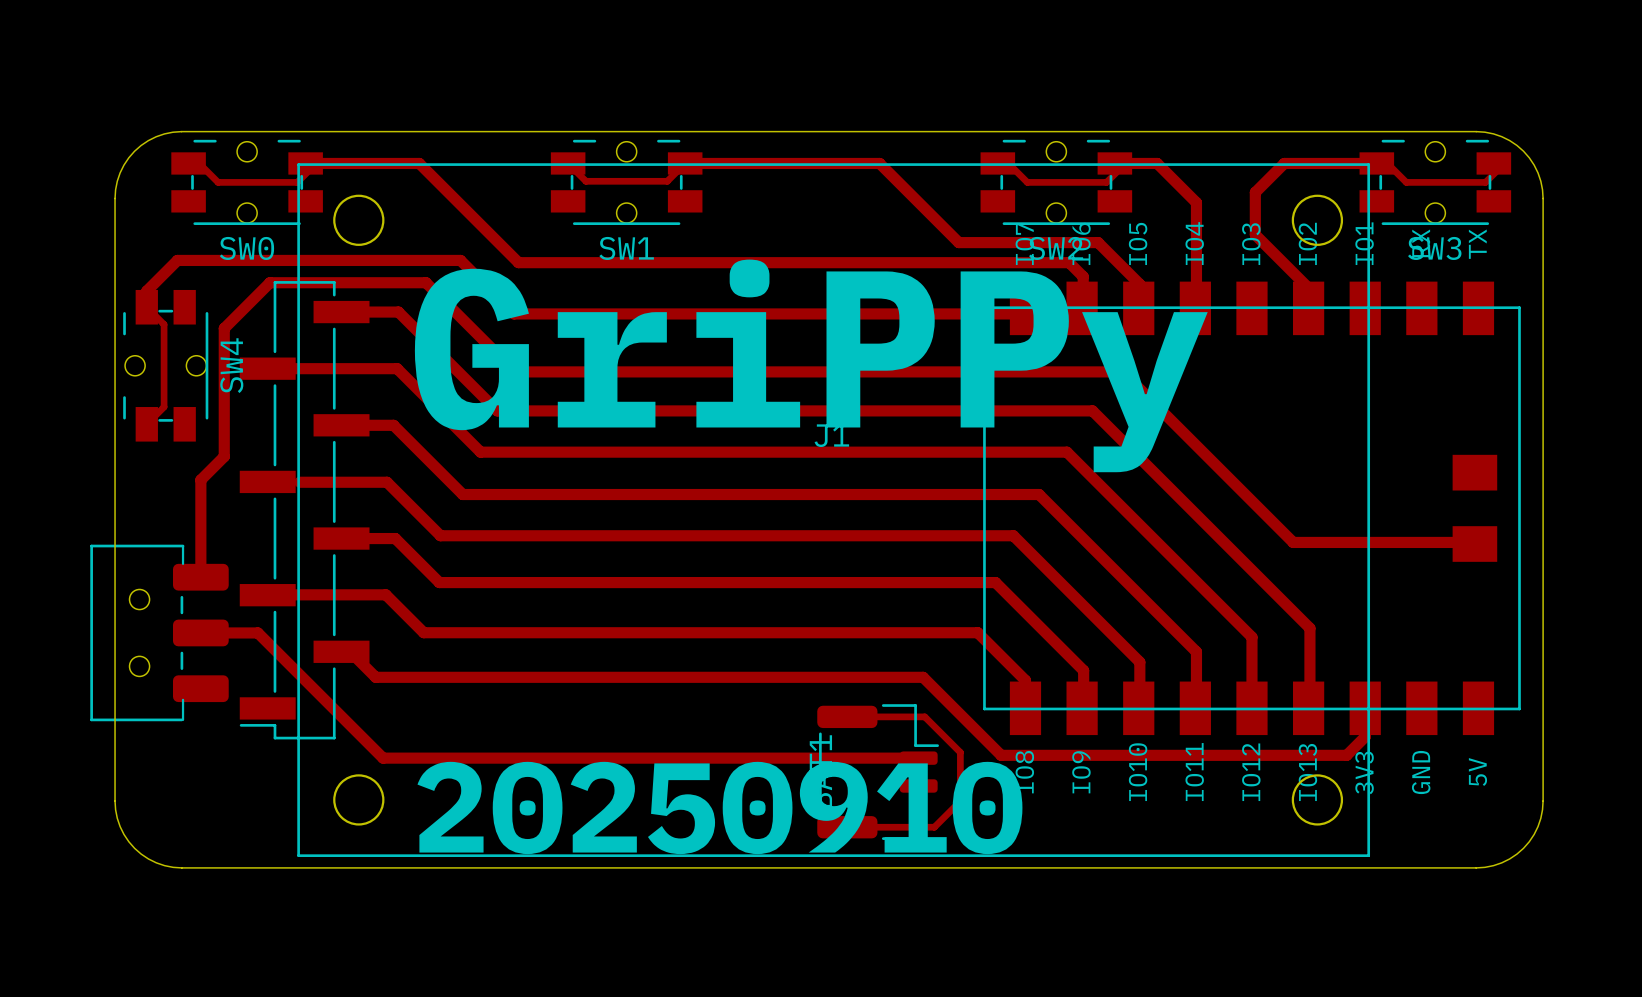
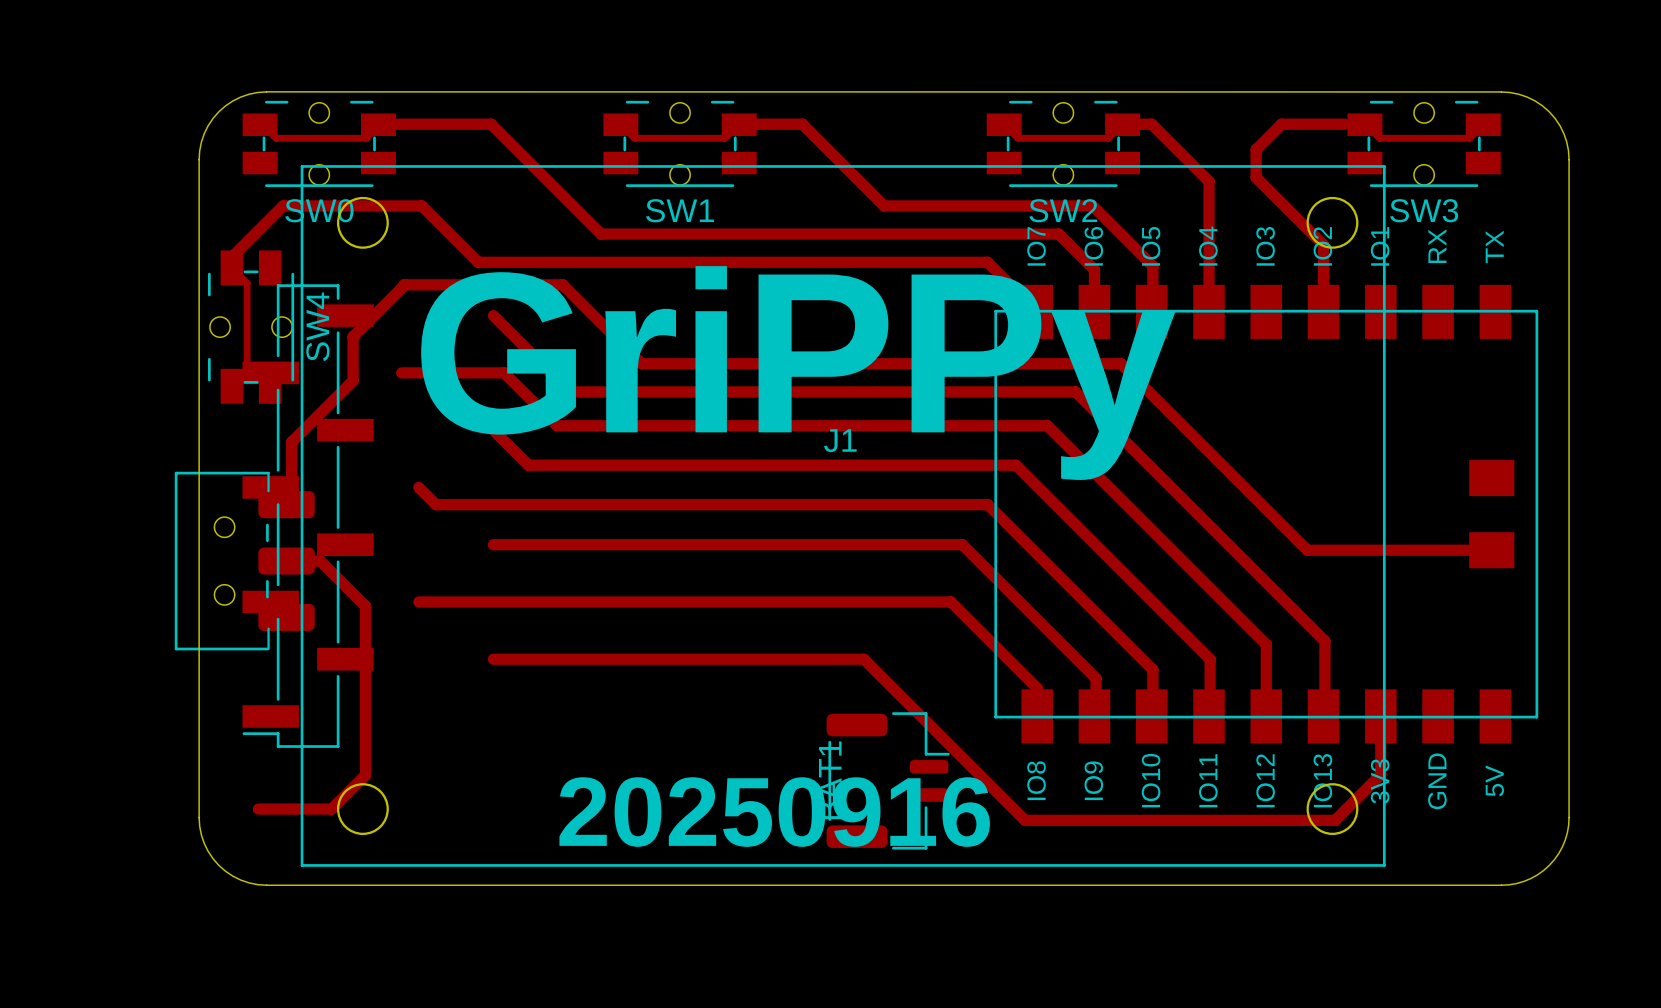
top track: none -> (262, 124) (276, 138) (366, 138) (380, 124)
top track: none -> (378, 124) (491, 124) (601, 234) (1058, 234) (1094, 269) (1094, 311)
top track: none -> (620, 124) (634, 138) (724, 138) (738, 124)
top track: none -> (1003, 124) (1017, 138) (1108, 138) (1122, 124)
top track: none -> (1123, 124) (1151, 124) (1209, 181) (1209, 311)
top track: none -> (1344, 124) (1281, 124) (1256, 149) (1256, 177) (1323, 245) (1323, 311)
top track: none -> (1365, 124) (1379, 138) (1469, 138) (1483, 124)
board edge: (181, 131) (1476, 131) (1493, 133) (1509, 140) (1523, 151) (1534, 165) (1540, 181) (1543, 198) (1543, 801) (1540, 818) (1534, 834) (1523, 848) (1509, 858) (1493, 865) (1476, 867) (181, 867) (164, 865) (148, 858) (134, 848) (123, 834) (117, 818) (115, 801) (115, 198) (120, 172) (134, 151) (156, 136) (181, 131) -> (266, 91) (1501, 91) (1518, 94) (1535, 101) (1549, 111) (1560, 125) (1566, 142) (1569, 159) (1569, 817) (1565, 839) (1558, 853) (1543, 870) (1530, 878) (1516, 883) (1501, 885) (266, 885) (249, 882) (232, 876) (218, 865) (208, 851) (201, 835) (199, 817) (199, 159) (204, 133) (218, 111) (240, 97) (266, 91)
top track: (199, 163) (218, 182) (297, 182) (316, 163) (419, 163) (518, 262) (1069, 262) (1083, 276) (1082, 314) -> none
top track: (568, 163) (585, 181) (667, 181) (685, 163) (879, 163) (958, 242) (1098, 242) (1139, 284) -> (739, 124) (802, 124) (884, 205) (1092, 205) (1152, 266) (1152, 287)
top track: (1008, 163) (1027, 182) (1106, 182) (1125, 163) (1157, 163) (1196, 202) (1195, 314) -> none
top track: (1504, 163) (1485, 182) (1406, 182) (1387, 163) (1284, 163) (1255, 192) (1255, 234) (1309, 289) (1308, 314) -> none
SW0 position: (247, 182) -> (319, 143)
SW1 position: (626, 182) -> (680, 143)
SW2 position: (1056, 182) -> (1063, 143)
SW3 position: (1435, 182) -> (1424, 143)
top track: none -> (231, 267) (247, 283) (247, 371) (231, 386)
top track: none -> (231, 278) (231, 257) (283, 205) (421, 205) (478, 262) (987, 262) (1037, 311)
top track: none -> (403, 284) (562, 284) (641, 363) (1120, 363) (1307, 550) (1491, 550)
top track: none -> (404, 284) (353, 336) (353, 380) (291, 442) (291, 499) (286, 504)
top track: (358, 312) (398, 312) (497, 410) (1092, 410) (1309, 628) (1309, 633) -> (493, 315) (569, 391) (1075, 391) (1324, 641)
top track: (1025, 314) (514, 313) (460, 260) (177, 260) (146, 291) (146, 307) (164, 324) (164, 407) (146, 424) -> none
SW4 position: (165, 365) -> (251, 327)
top track: (265, 368) (397, 368) (480, 452) (1066, 452) -> (401, 372) (504, 372) (557, 425) (1047, 425) (1079, 457)
top track: (358, 425) (393, 425) (462, 494) (1039, 494) -> (493, 430) (528, 465) (1016, 465) (1050, 500)
top track: (299, 482) (387, 482) (440, 535) (1013, 535) -> (418, 487) (436, 504) (987, 504) (1025, 541)
top track: (358, 538) (395, 538) (439, 582) (995, 582) -> (493, 544) (962, 544) (1006, 589)
top track: (1474, 550) (1474, 554) (1462, 542) (1293, 542) (1122, 371) (515, 371) (426, 282) (269, 282) (224, 328) (224, 456) (200, 480) (200, 577) -> none
top track: none -> (286, 561) (320, 561) (365, 606) (365, 775) (331, 809) (258, 809)
top track: (284, 594) (385, 594) (423, 632) (977, 632) -> (418, 601) (950, 601) (988, 639)
part position: (159, 632) -> (244, 561)
top track: (200, 632) (257, 632) (383, 758) (918, 758) -> none
top track: (350, 651) (375, 677) (923, 677) (1001, 755) (1346, 755) (1365, 736) -> (493, 659) (863, 659) (1025, 820) (1335, 820) (1380, 774) (1380, 745)
top track: (847, 716) (924, 716) (960, 752) (960, 801) (934, 827) (847, 827) -> none
text: 20250910 (719, 807) -> 20250916 (774, 812)

